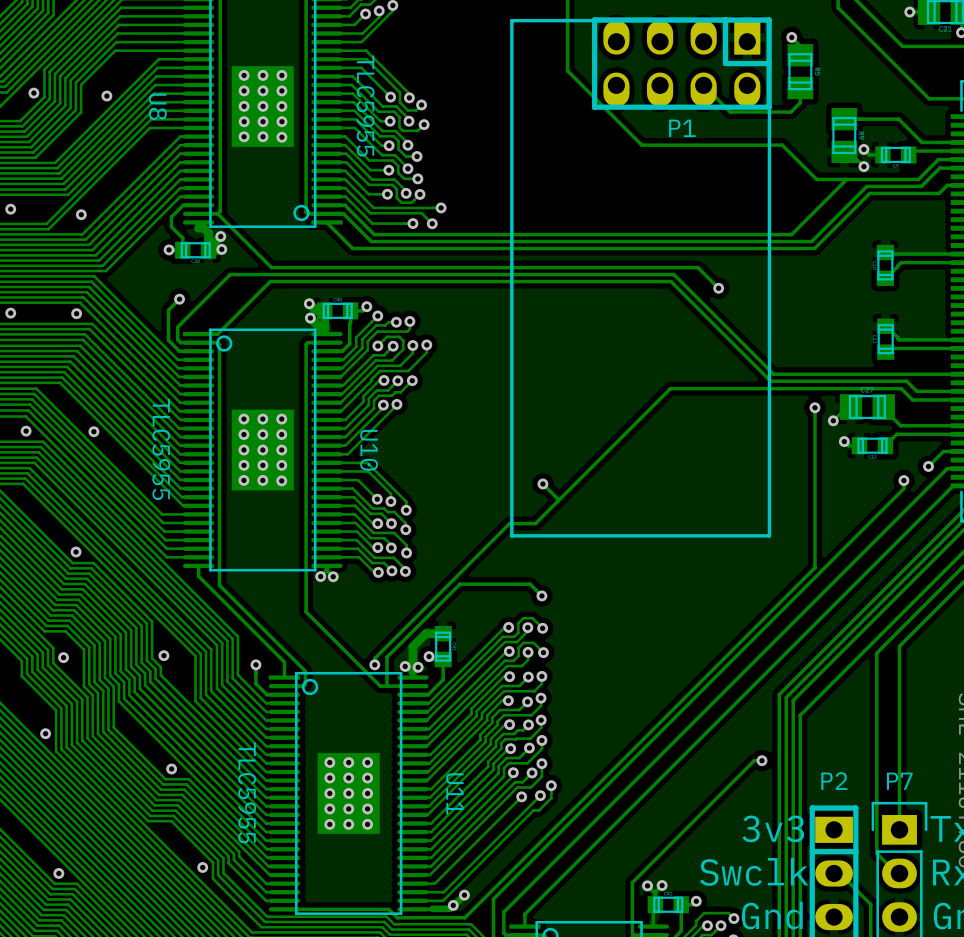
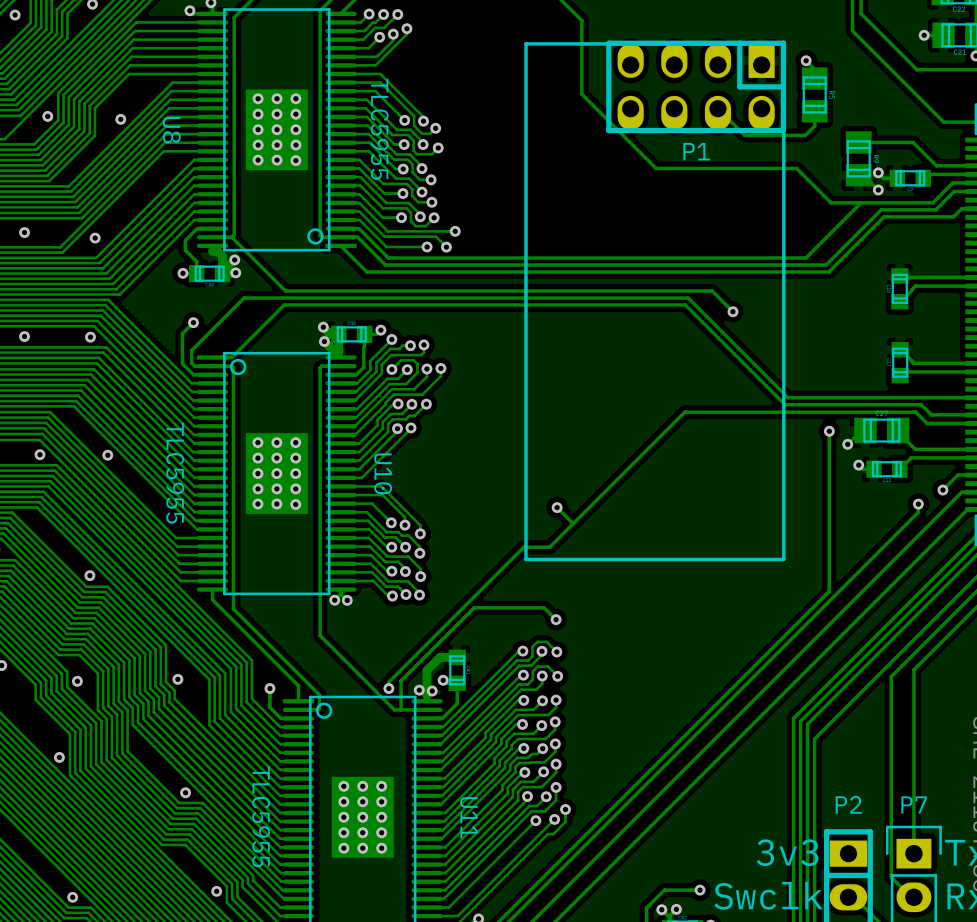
track: (762, 760) (754, 760) (632, 884) -> (700, 890) (664, 890) (646, 907)
via: (762, 760) -> none
via: none -> (700, 890)

